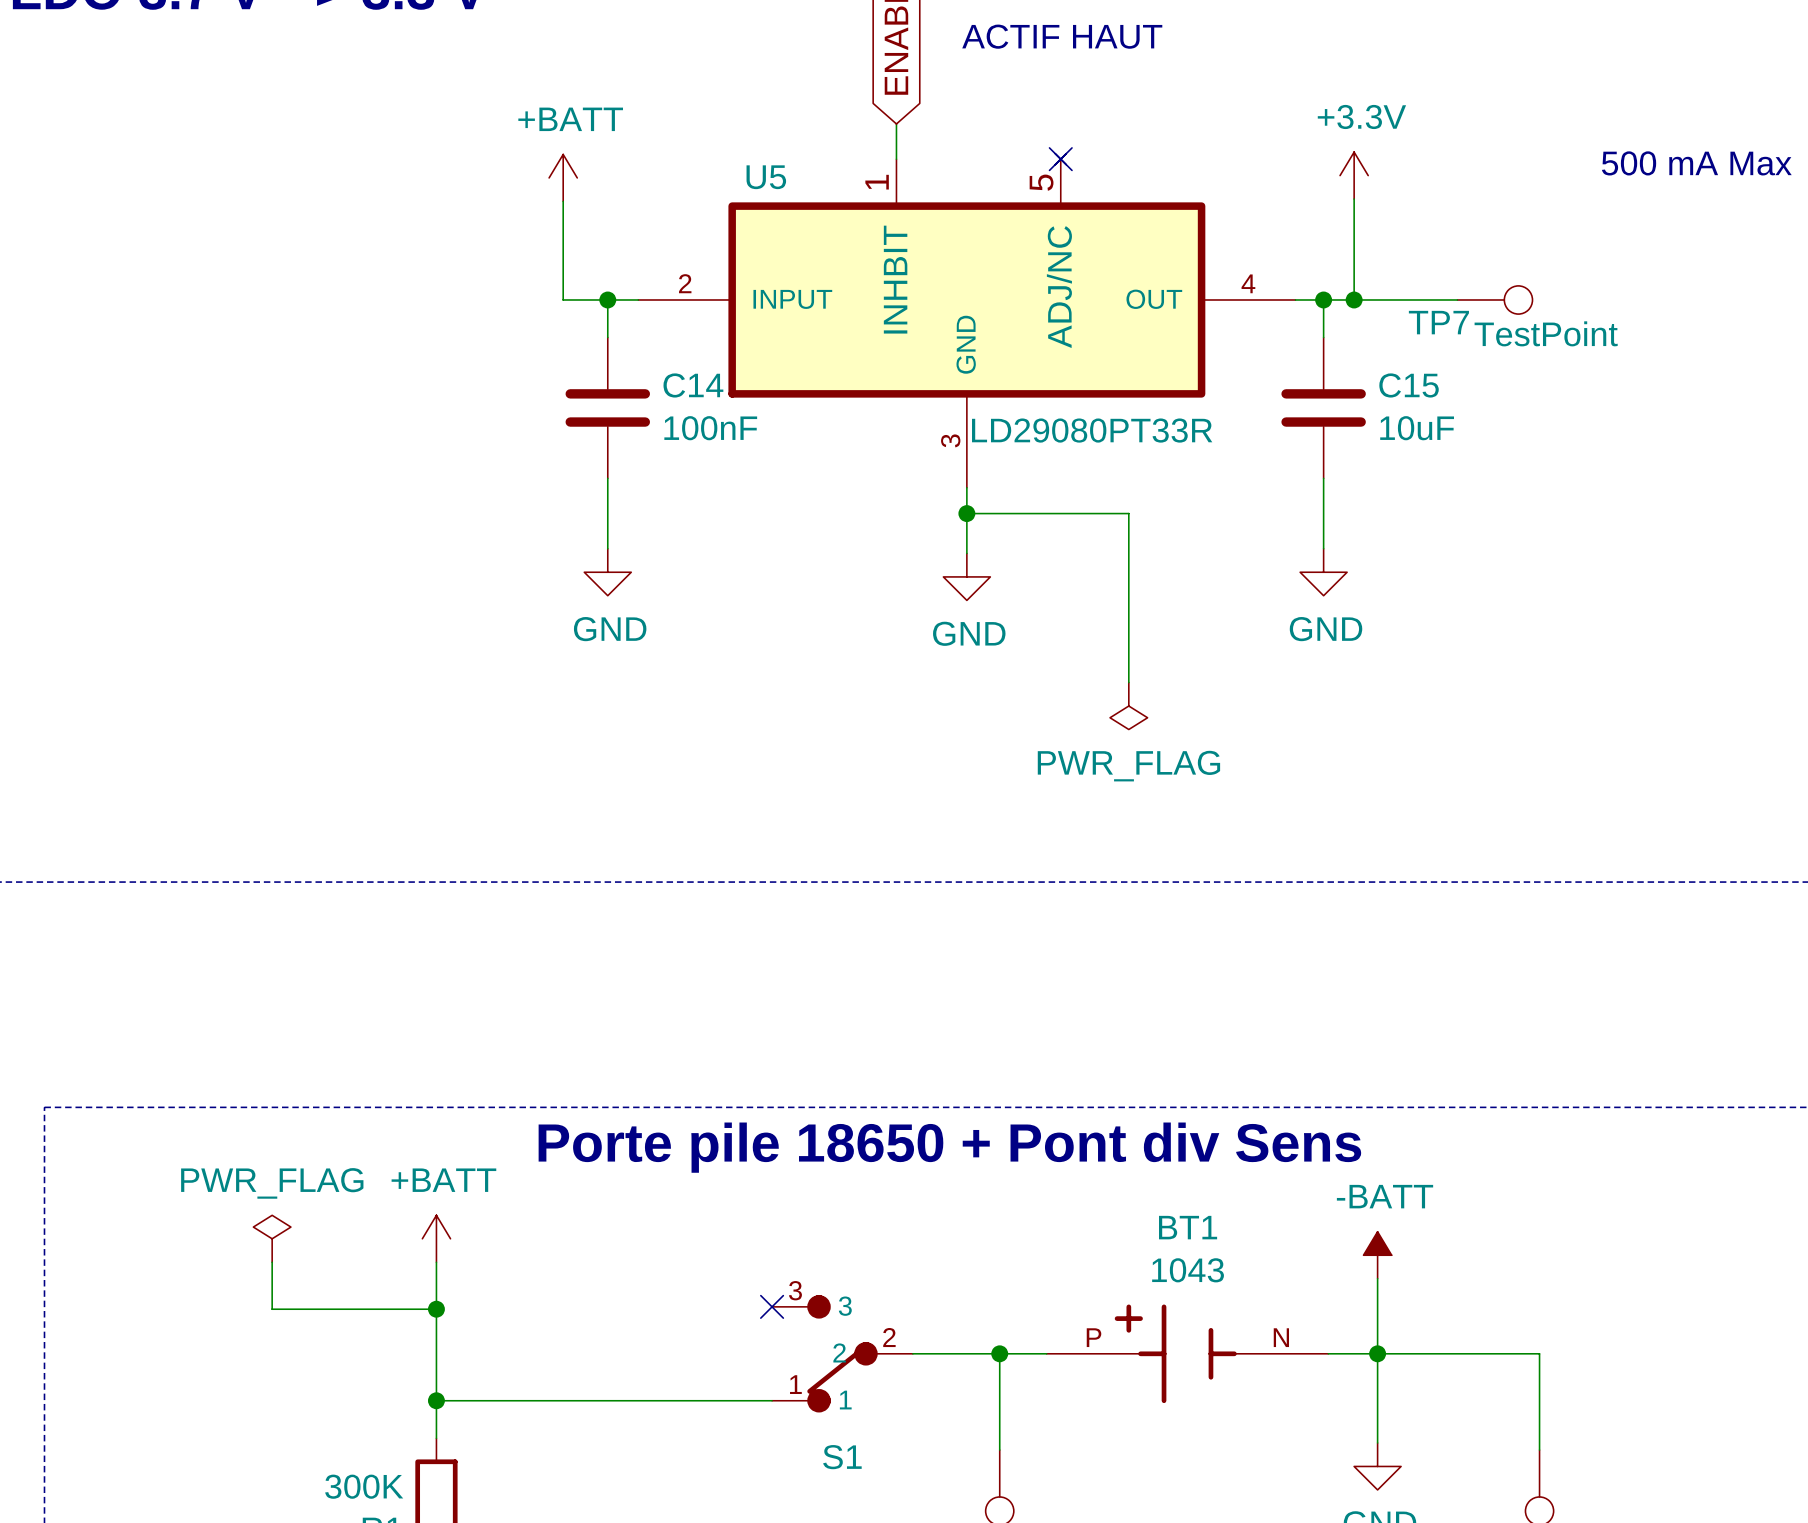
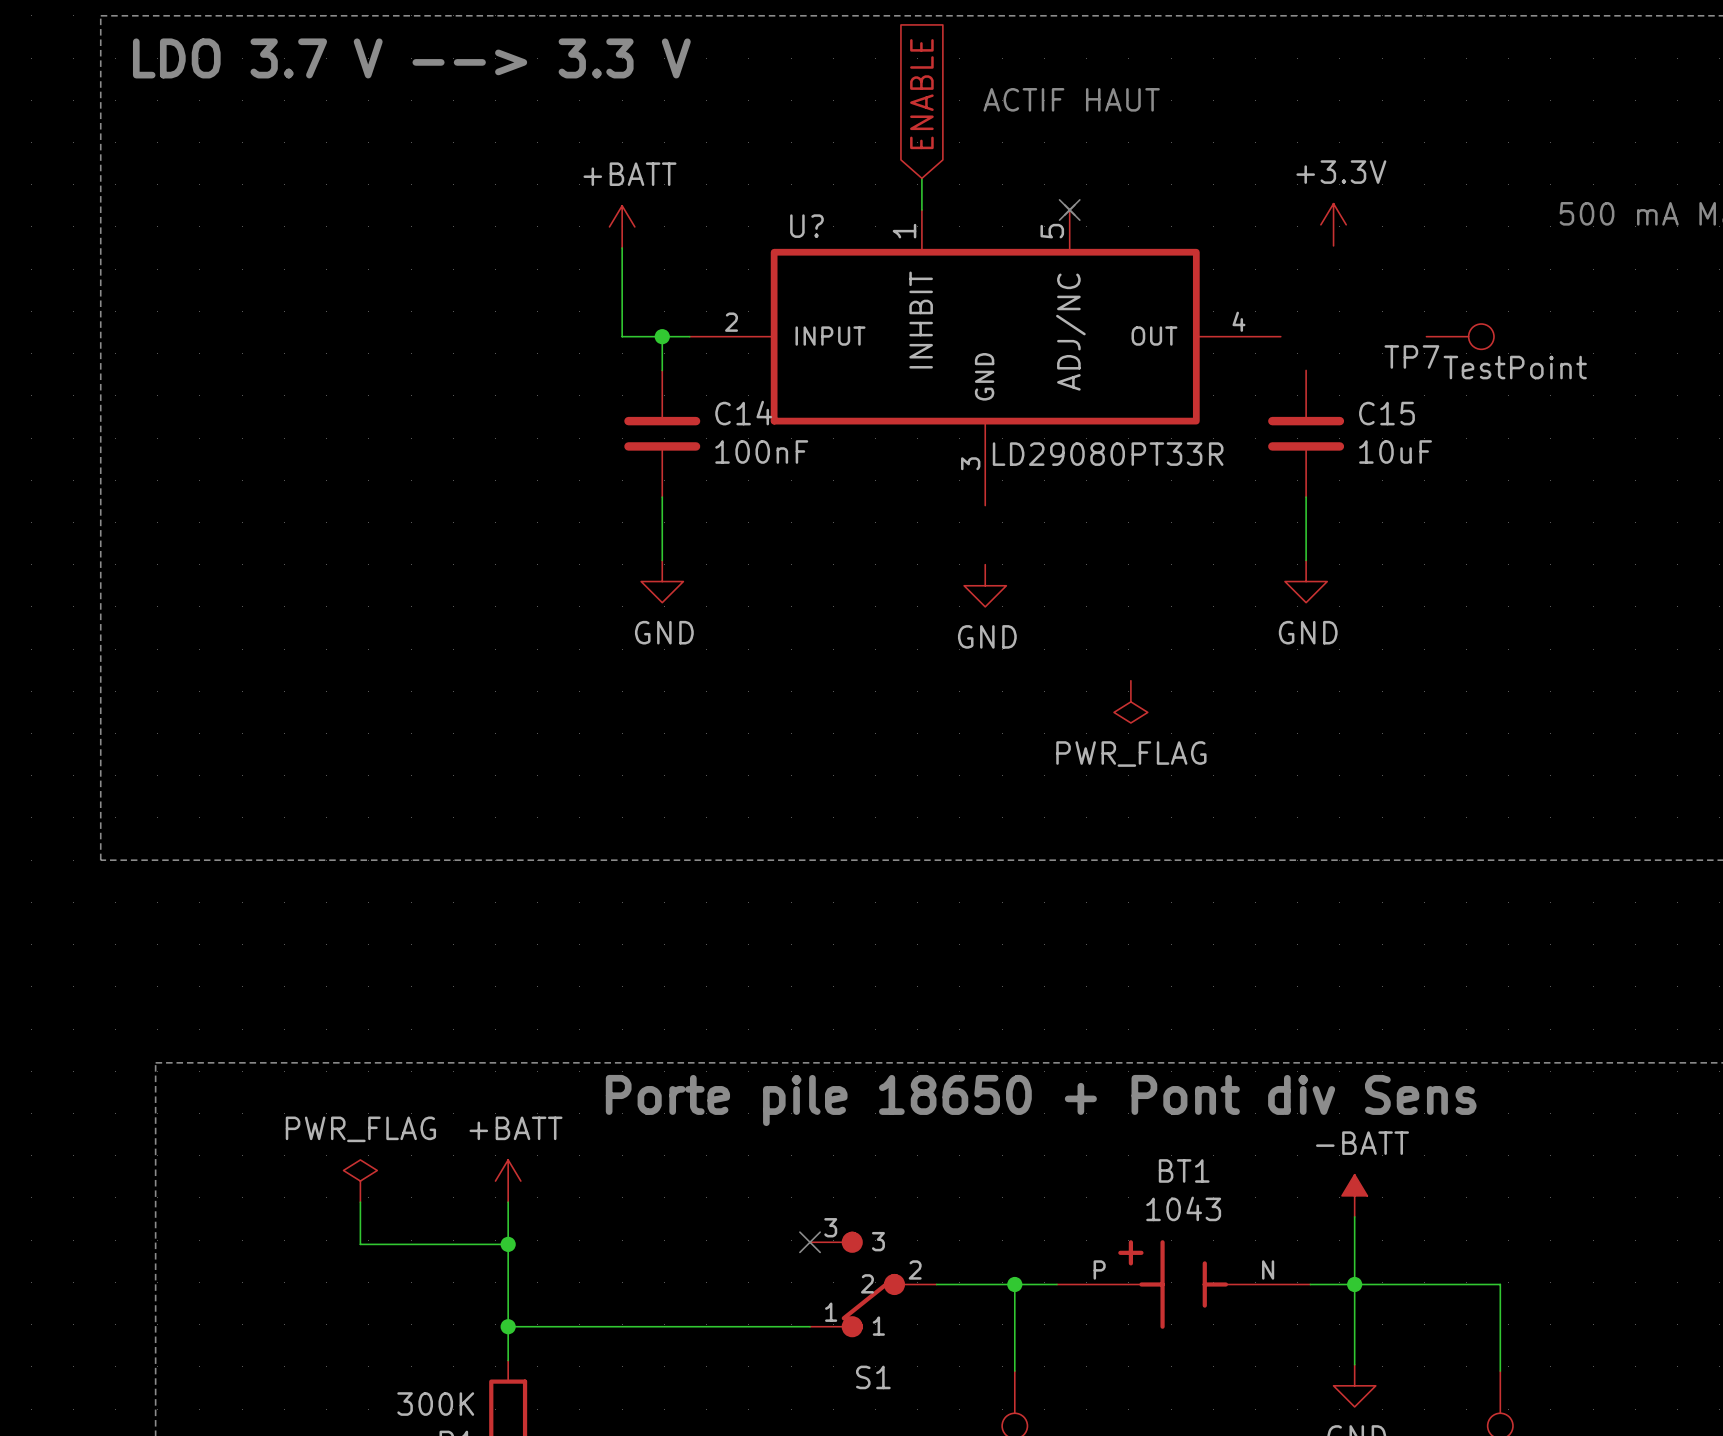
U5 name: U5 (766, 177) -> U? (806, 226)
wire: (1354, 199) (1354, 299) -> none
wire: (1295, 299) (1457, 299) -> none
wire: (1323, 299) (1323, 337) -> none
junction: (1323, 299) -> none
junction: (1354, 299) -> none
wire: (966, 487) (966, 553) -> none
wire: (966, 513) (1128, 513) (1128, 682) -> none
junction: (966, 513) -> none

